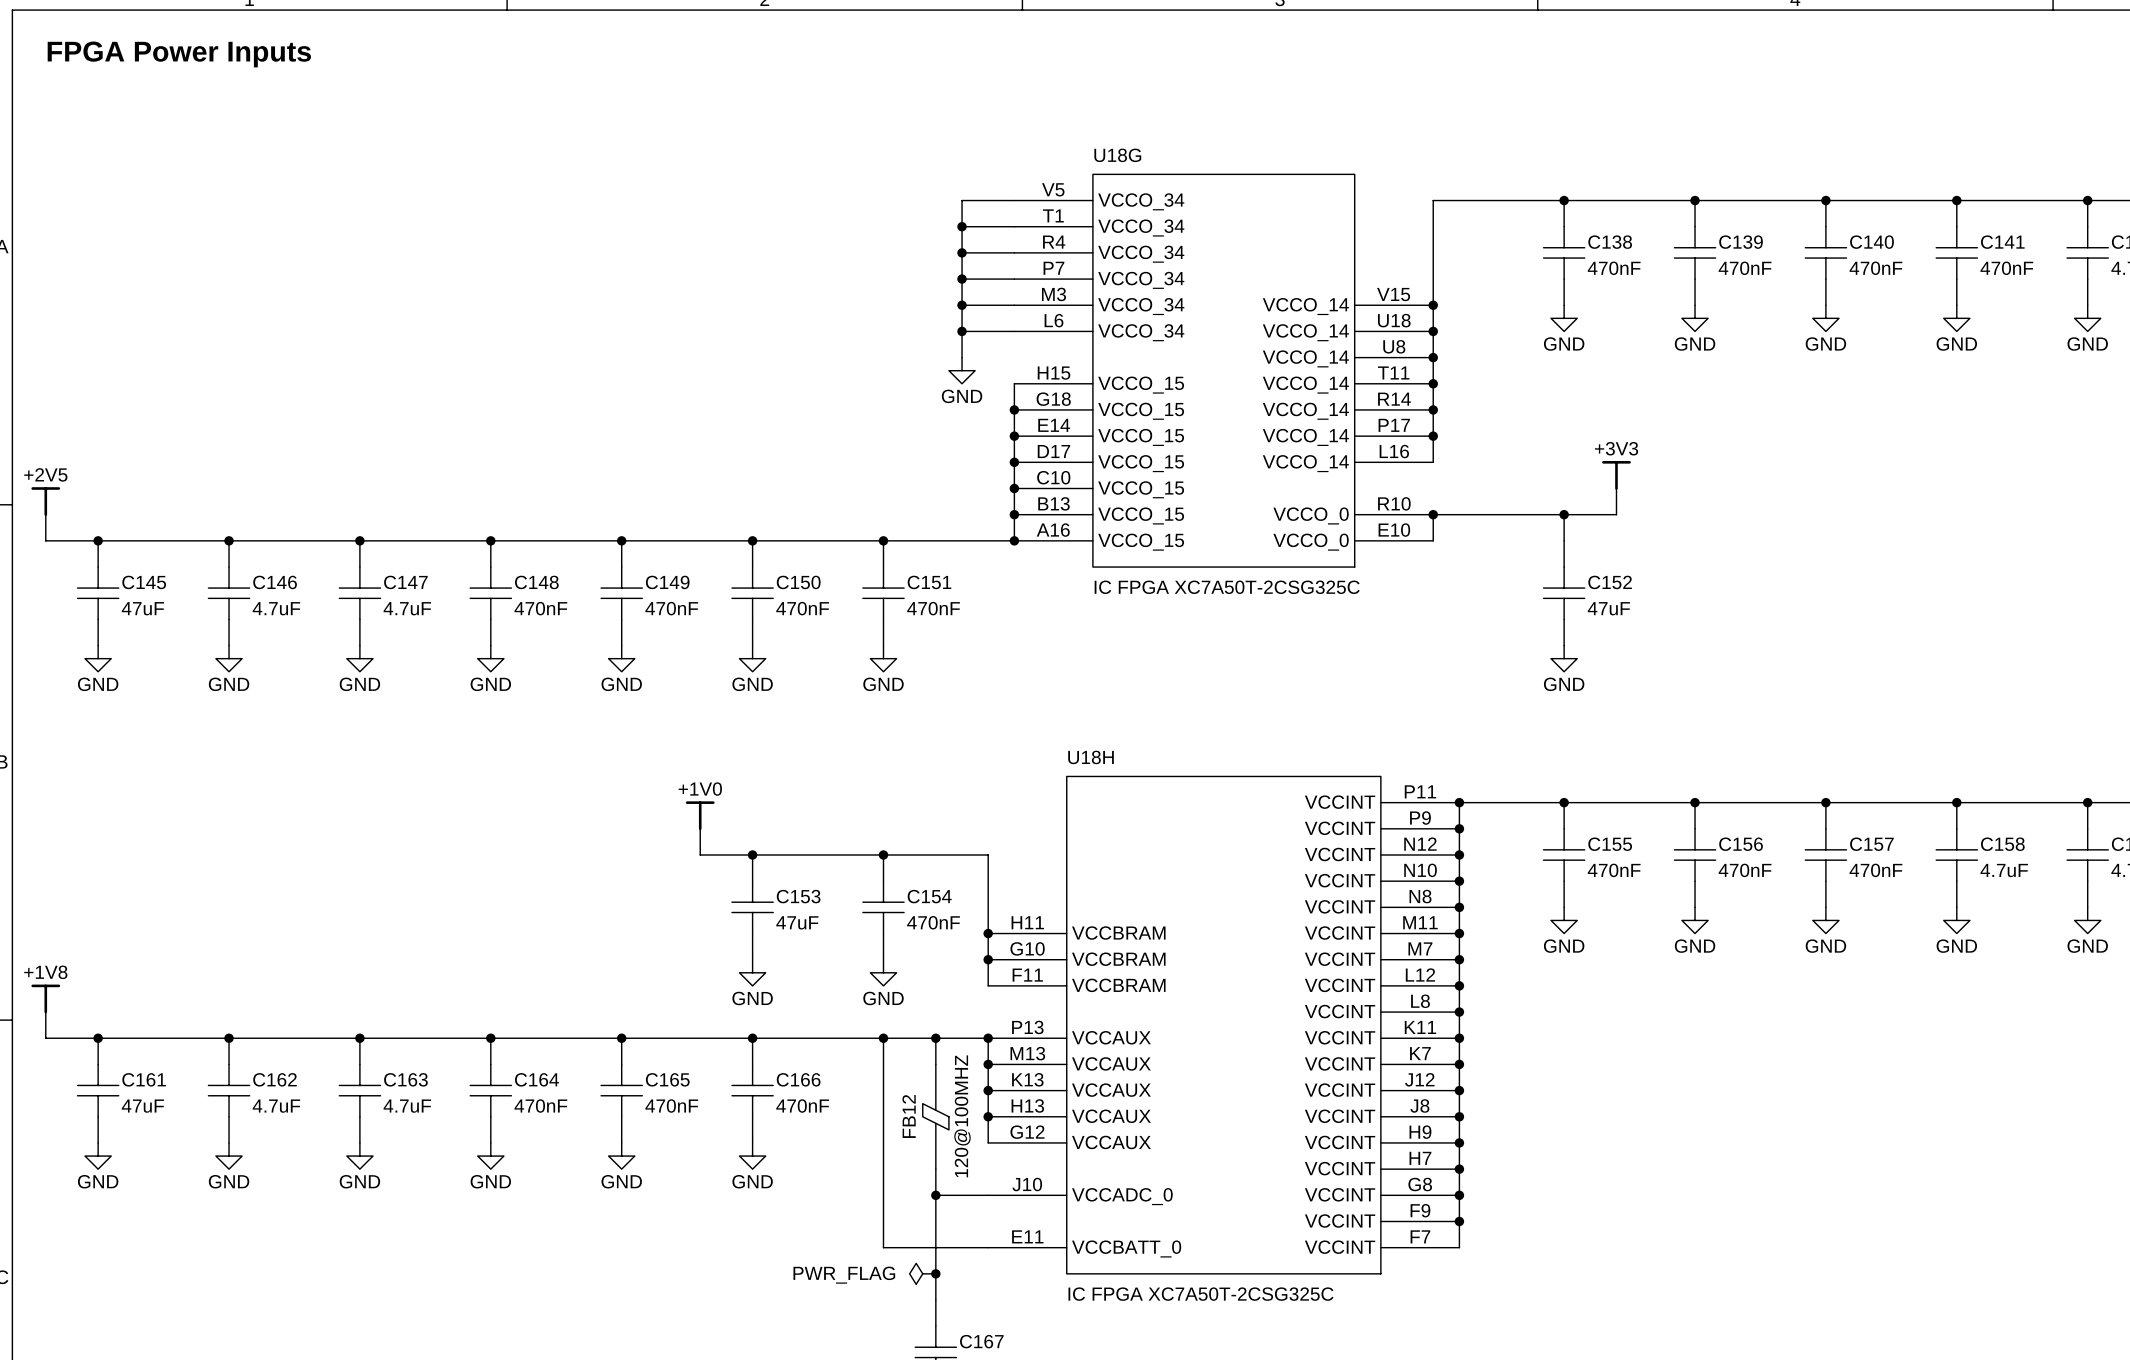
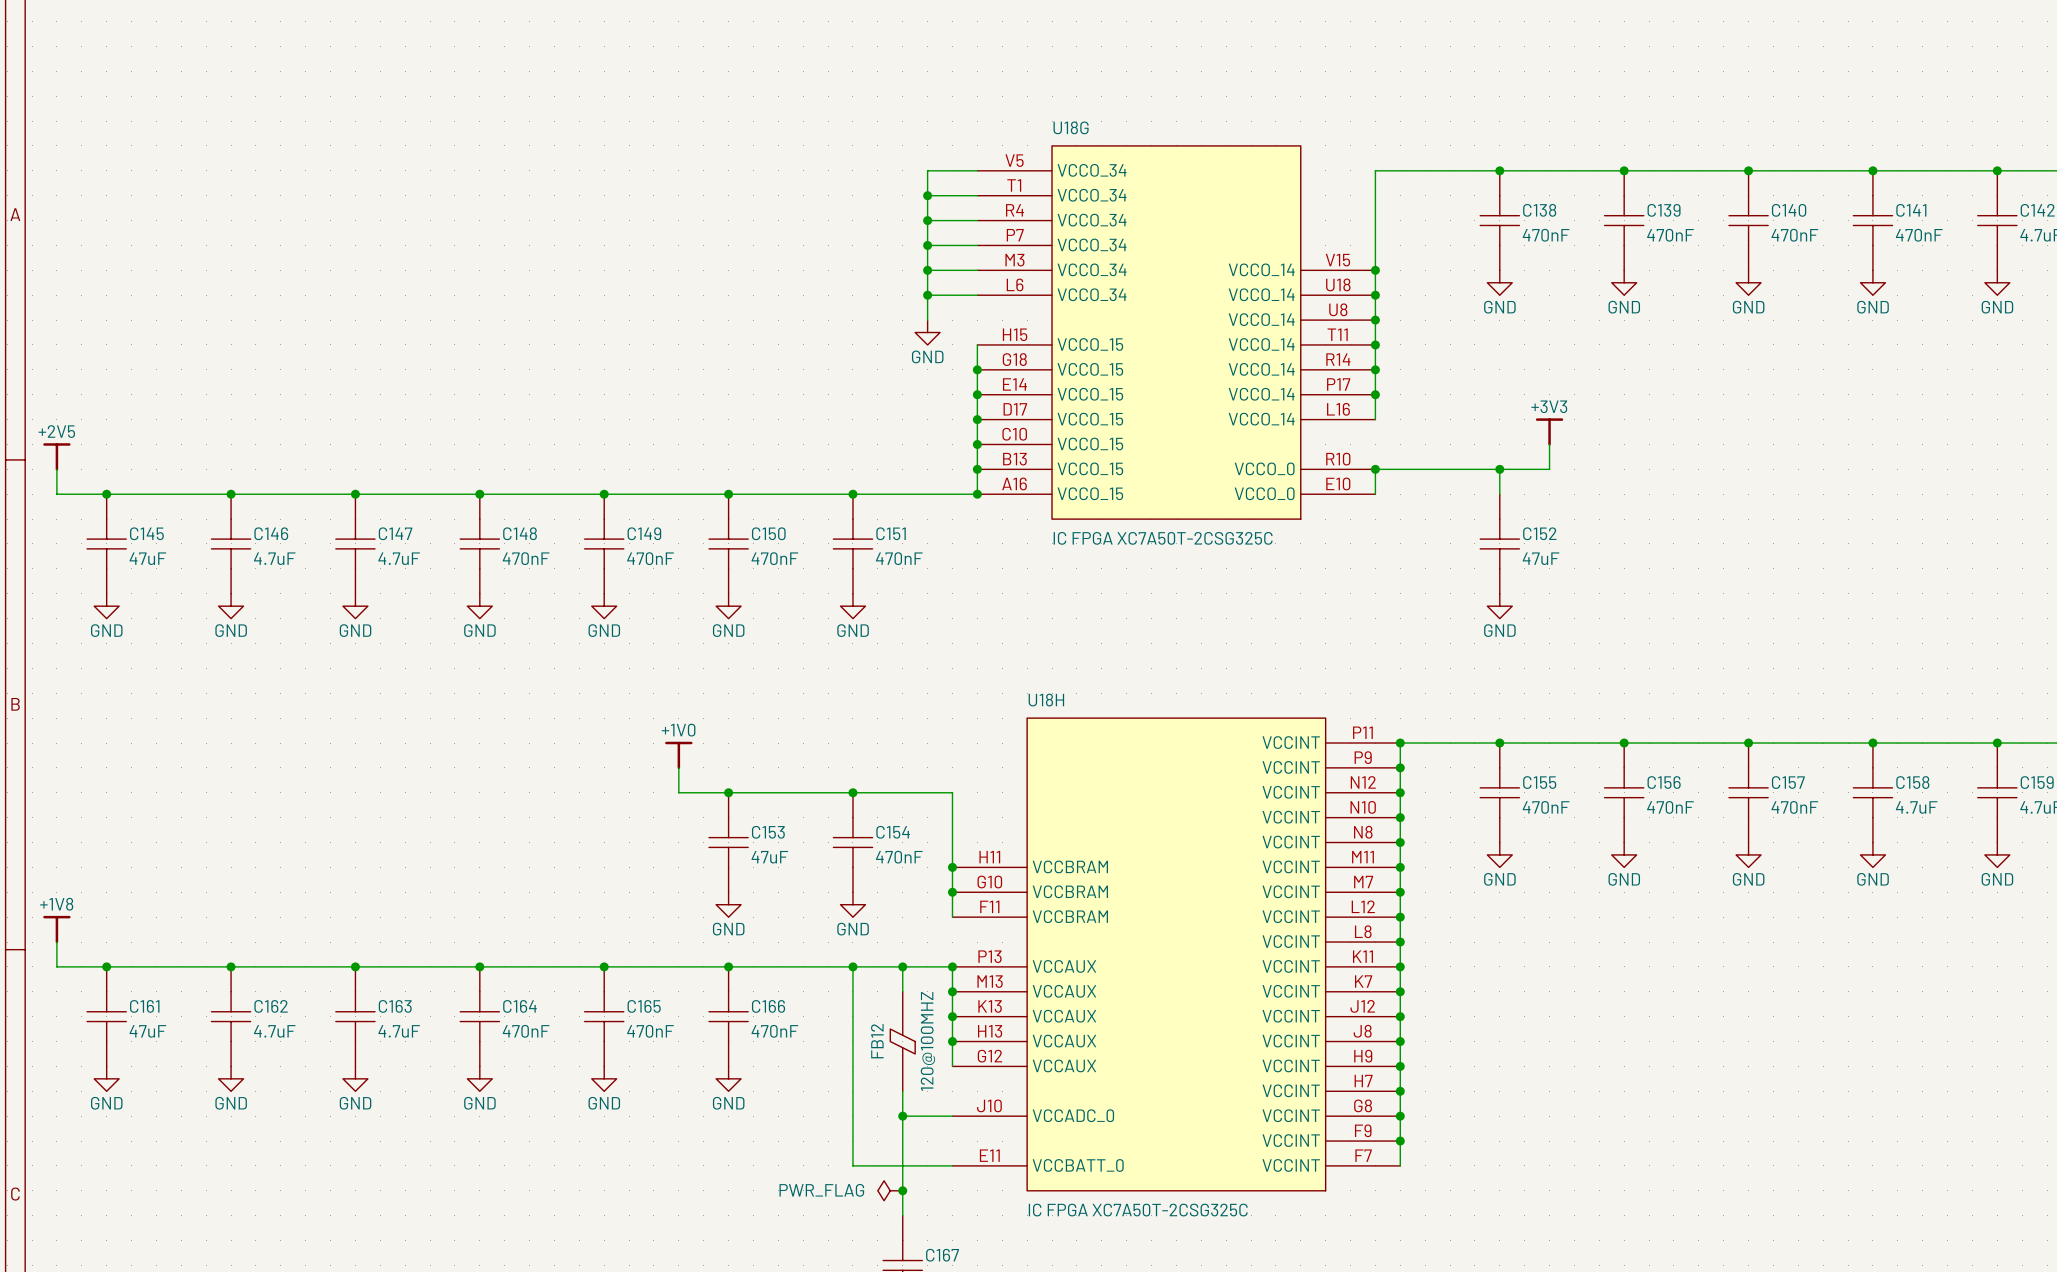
text: FPGA Power Inputs (179, 54) -> none

